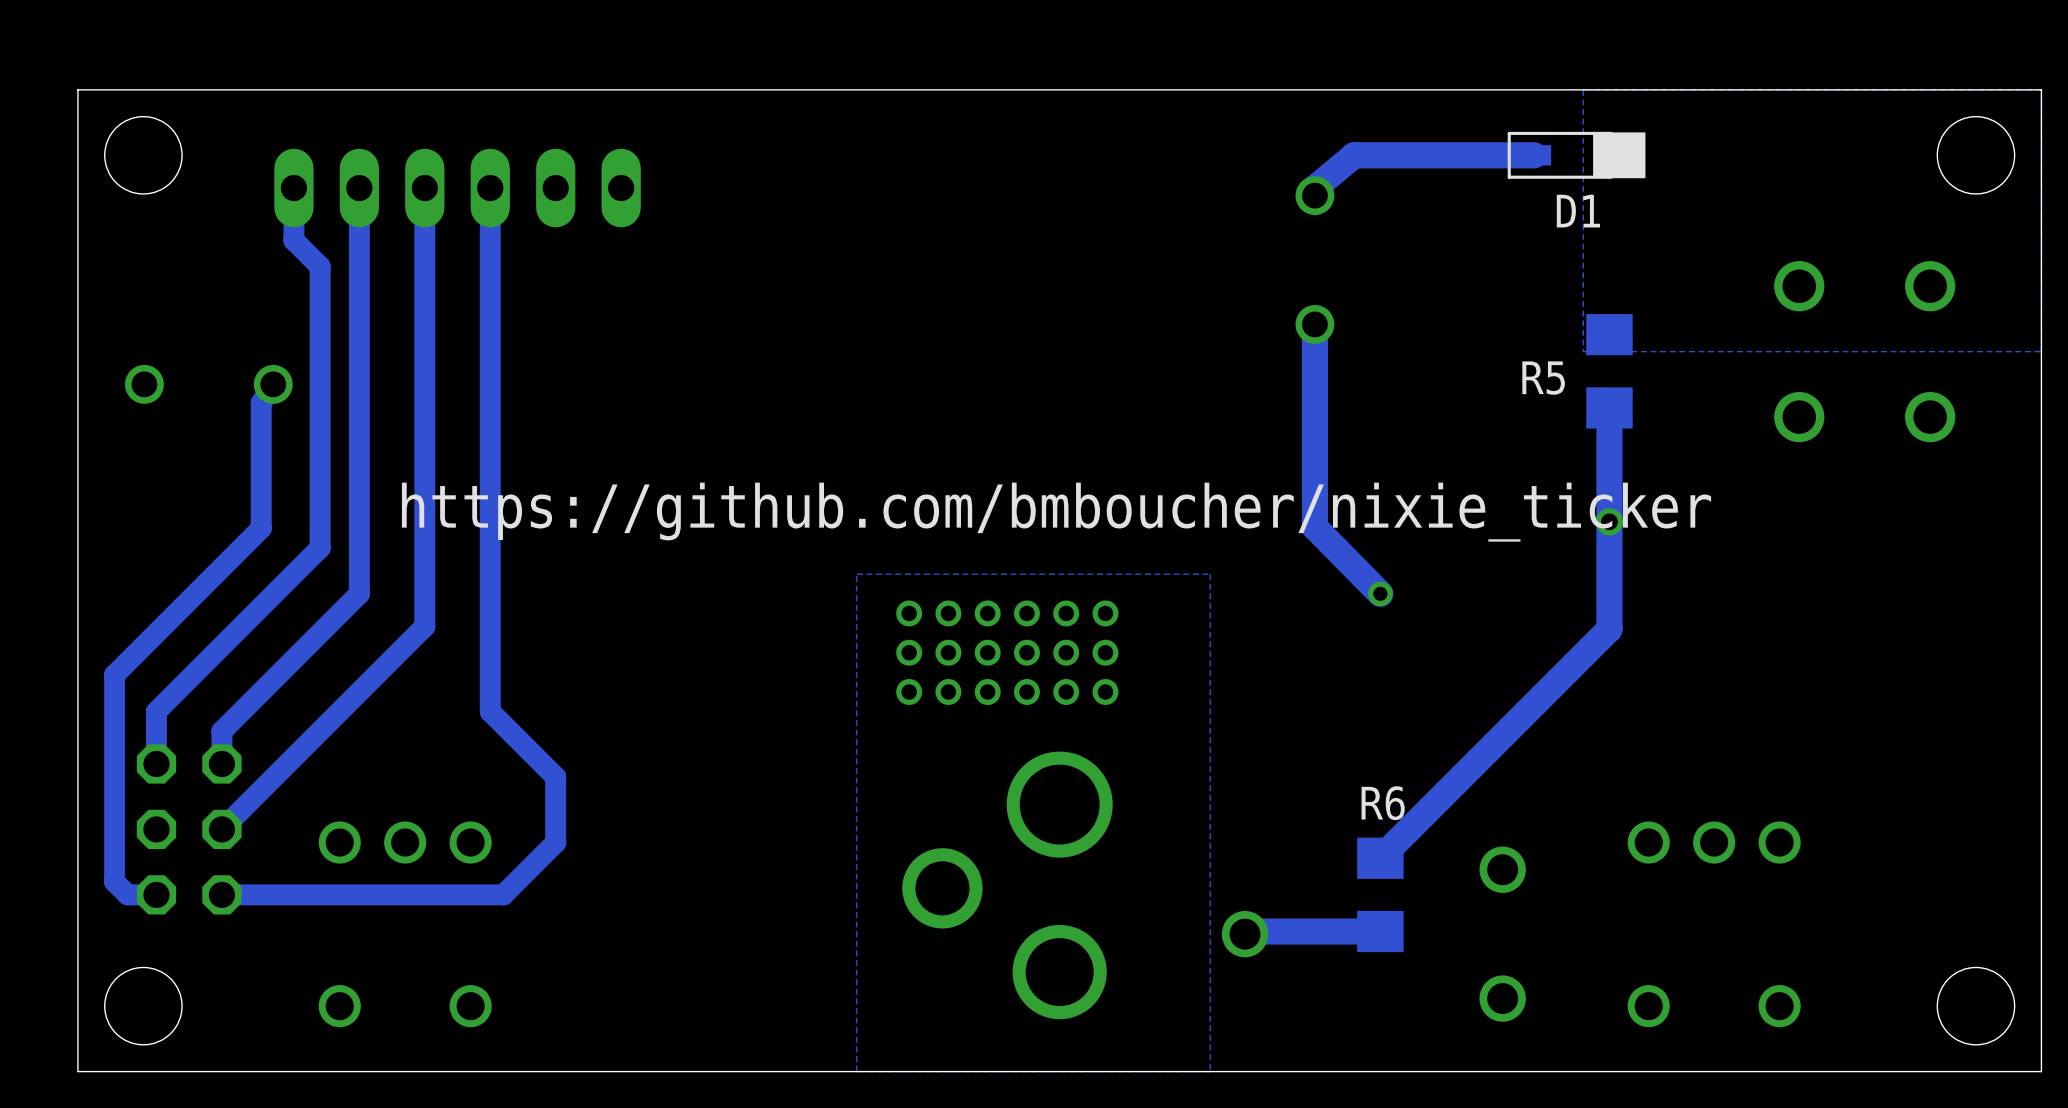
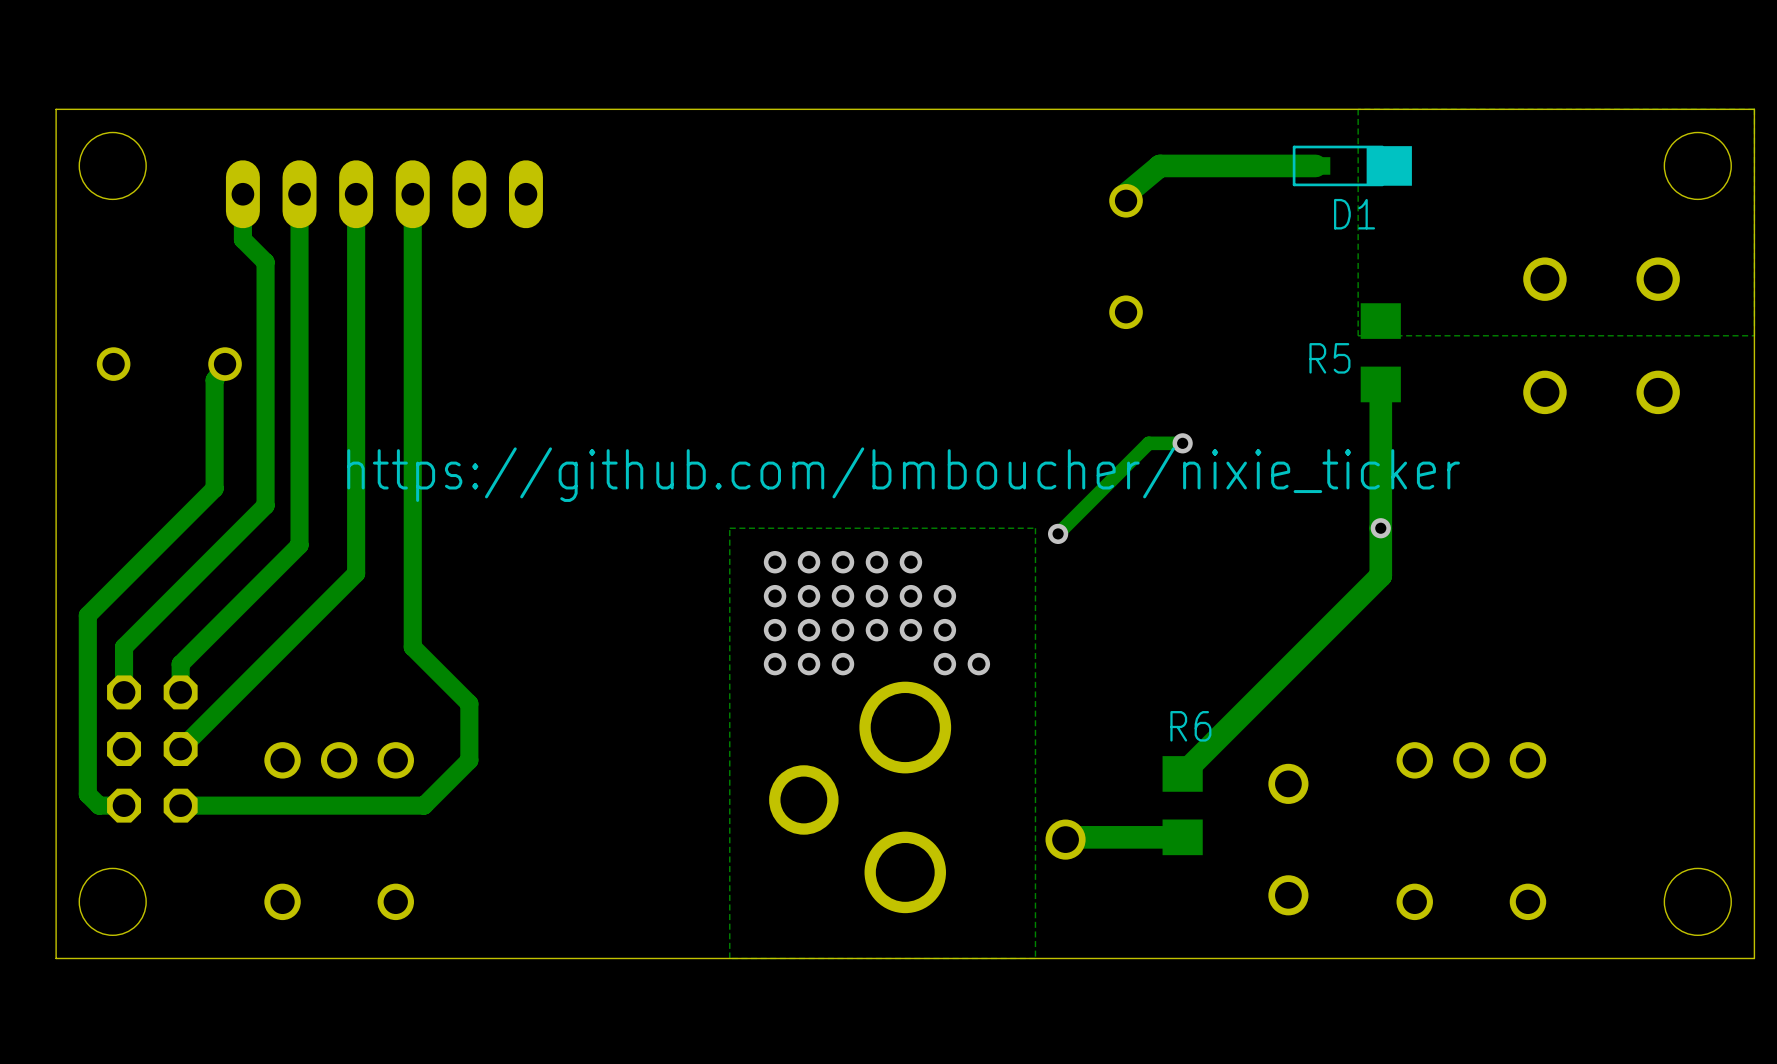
track: (1314, 324) (1314, 527) (1380, 593) -> none
track: none -> (1182, 443) (1148, 443) (1058, 533)
via: none -> (1182, 443)
via: (1609, 521) -> none
via: none -> (1380, 528)
via: none -> (1058, 533)
via: (1380, 593) -> none
via: (1105, 613) -> none
via: none -> (775, 664)
via: none -> (809, 664)
via: none -> (842, 664)
via: none -> (944, 664)
via: none -> (978, 664)

